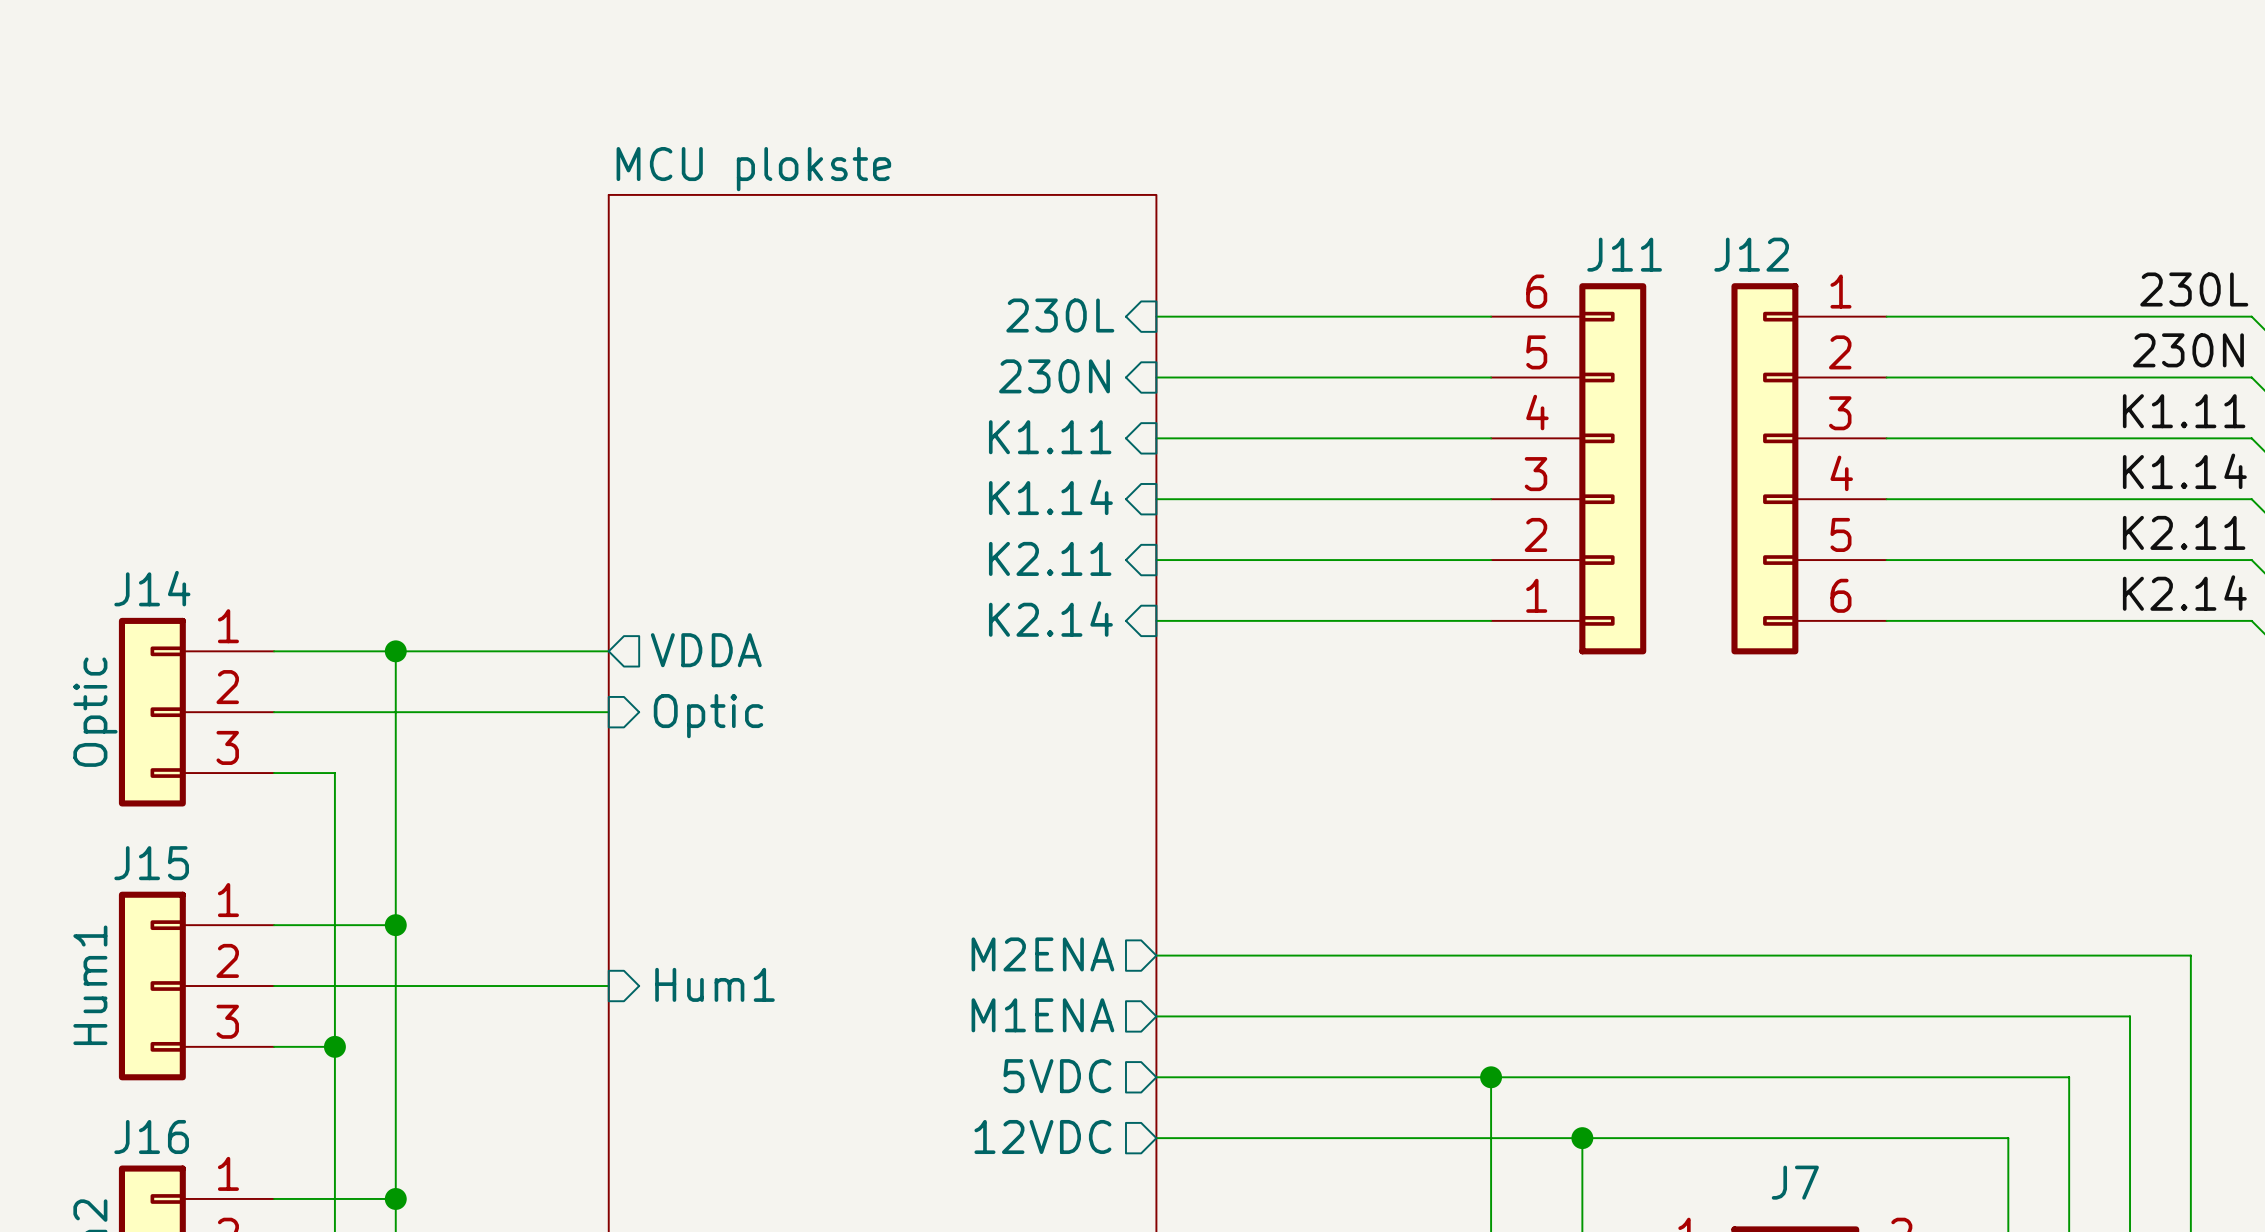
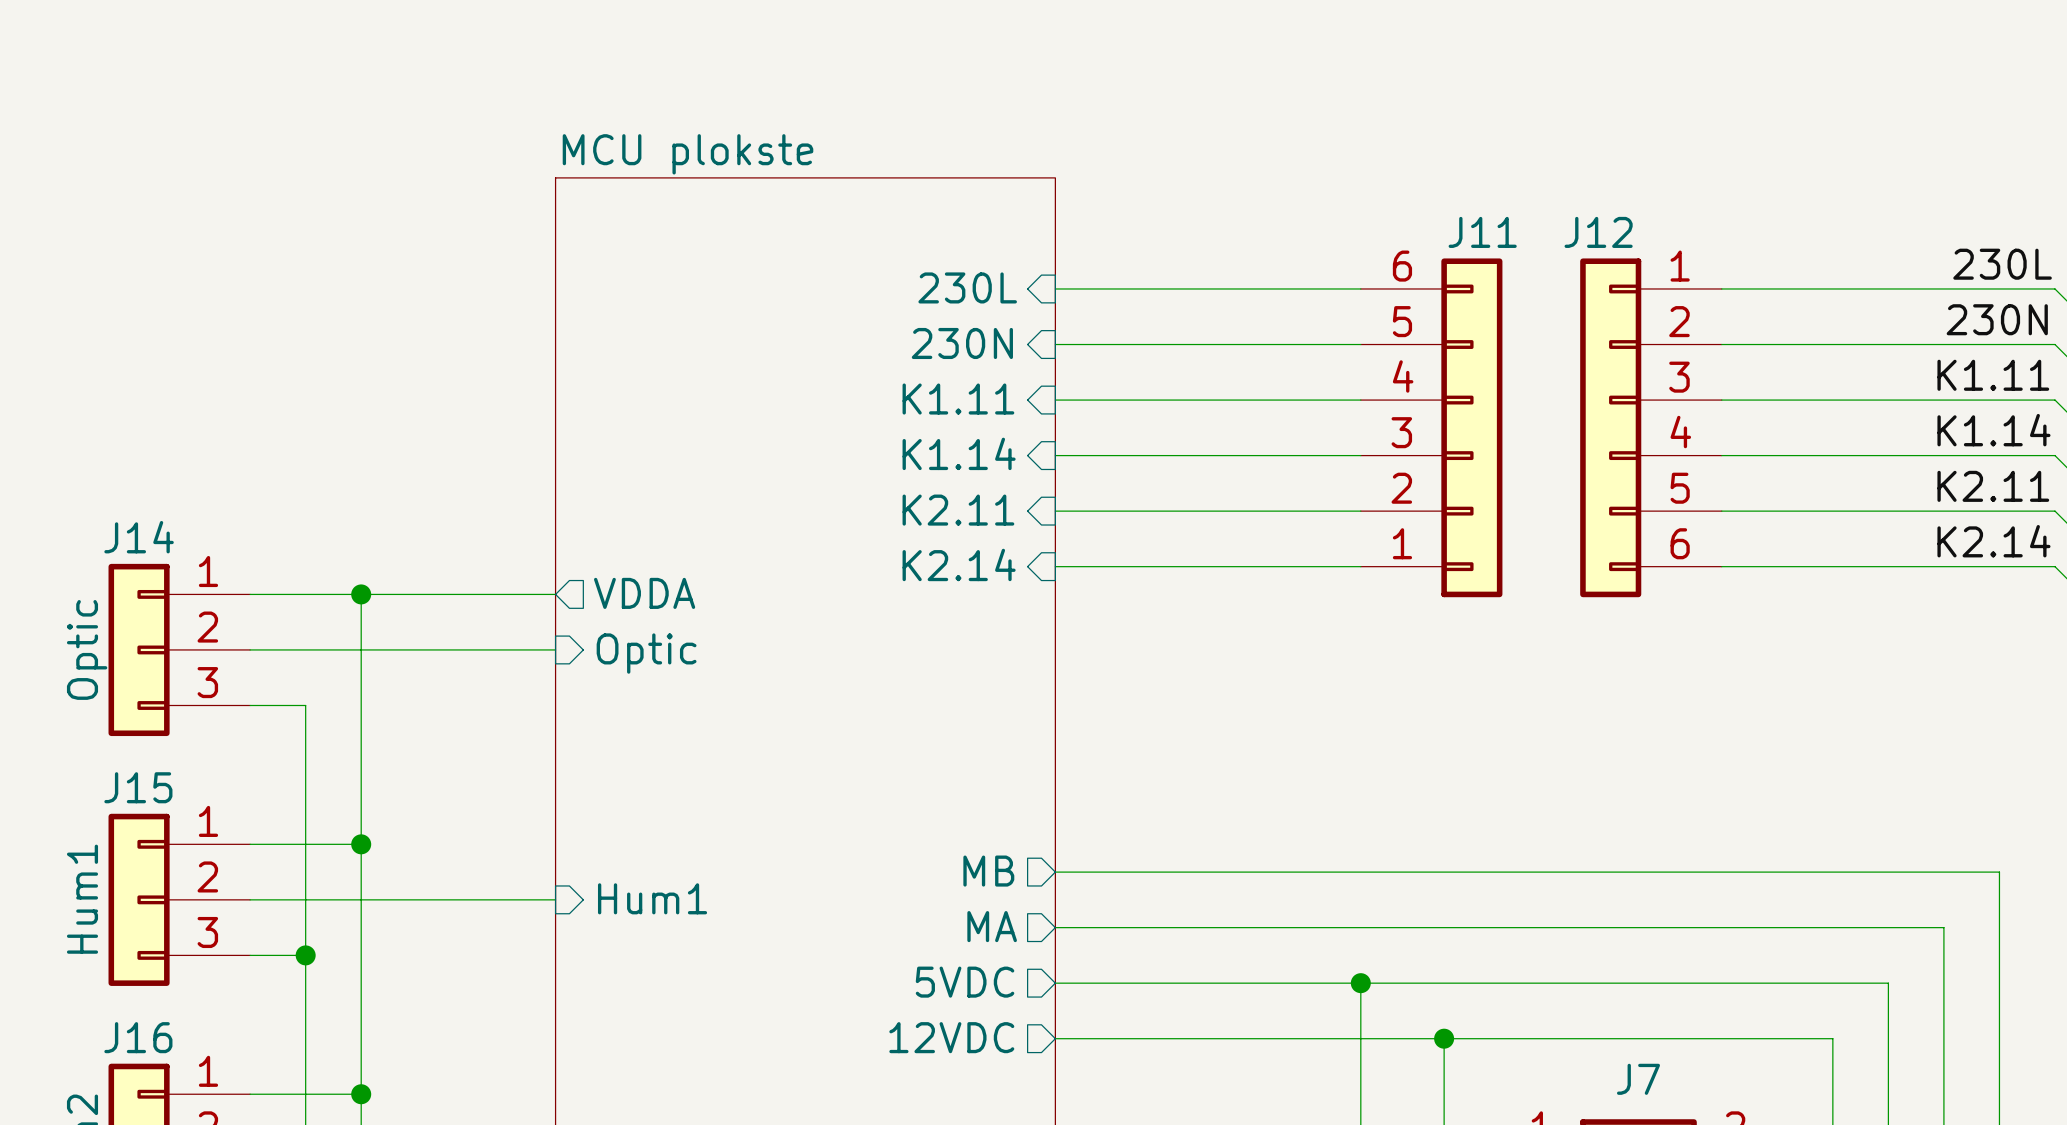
sheet pin: M2ENA (1042, 954) -> MB (988, 871)
sheet pin: M1ENA (1042, 1015) -> MA (992, 926)

